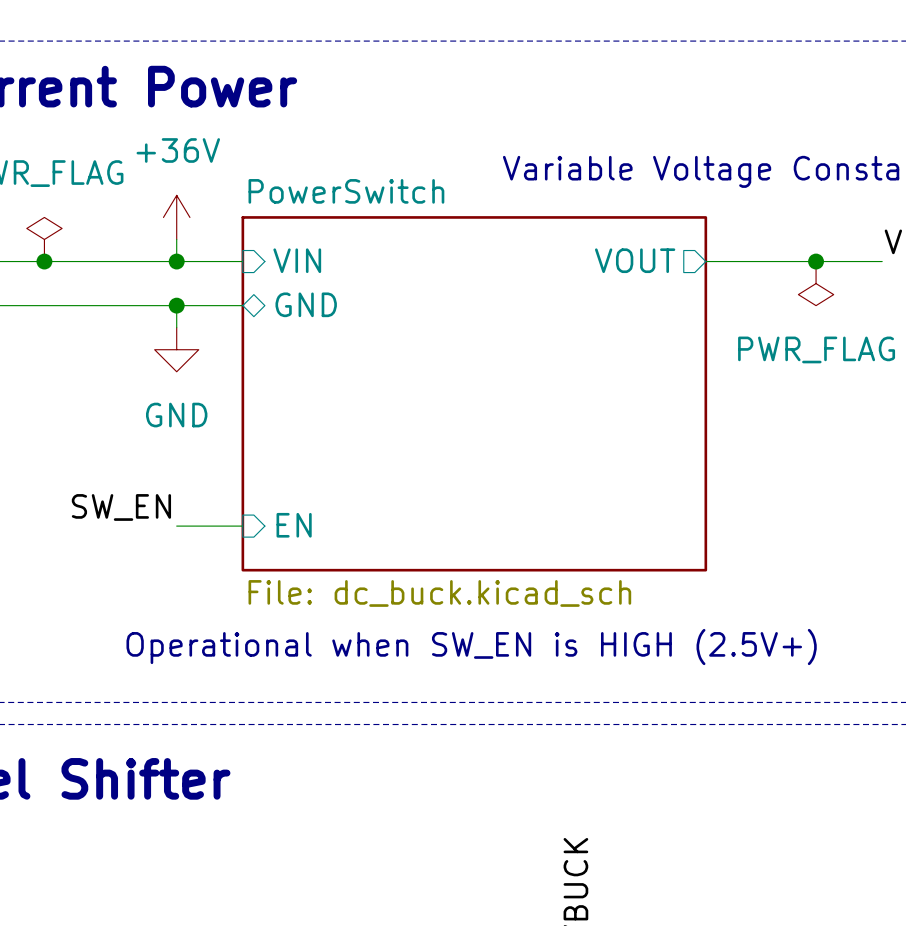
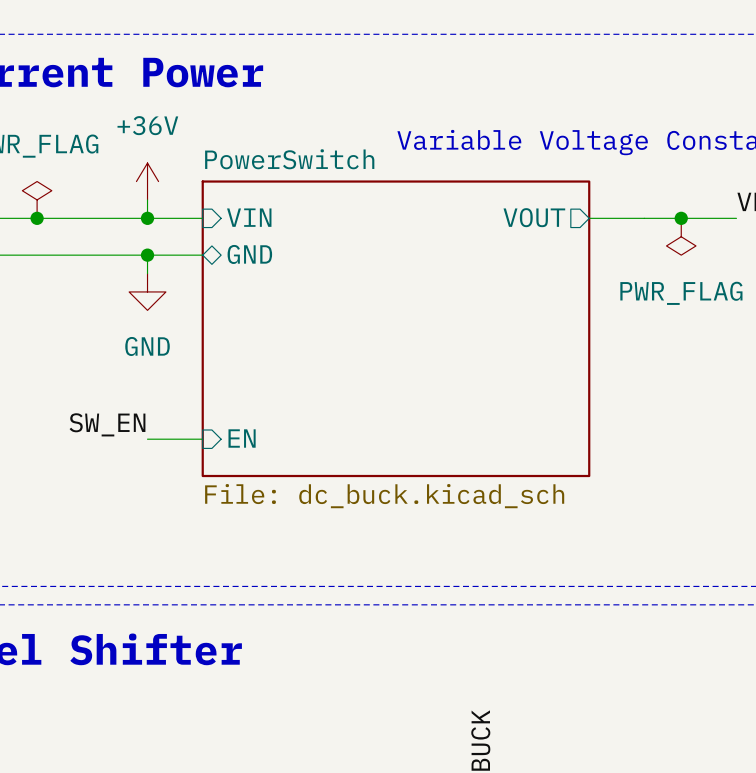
text: Operational when SW_EN is HIGH (2.5V+) (471, 647) -> none

